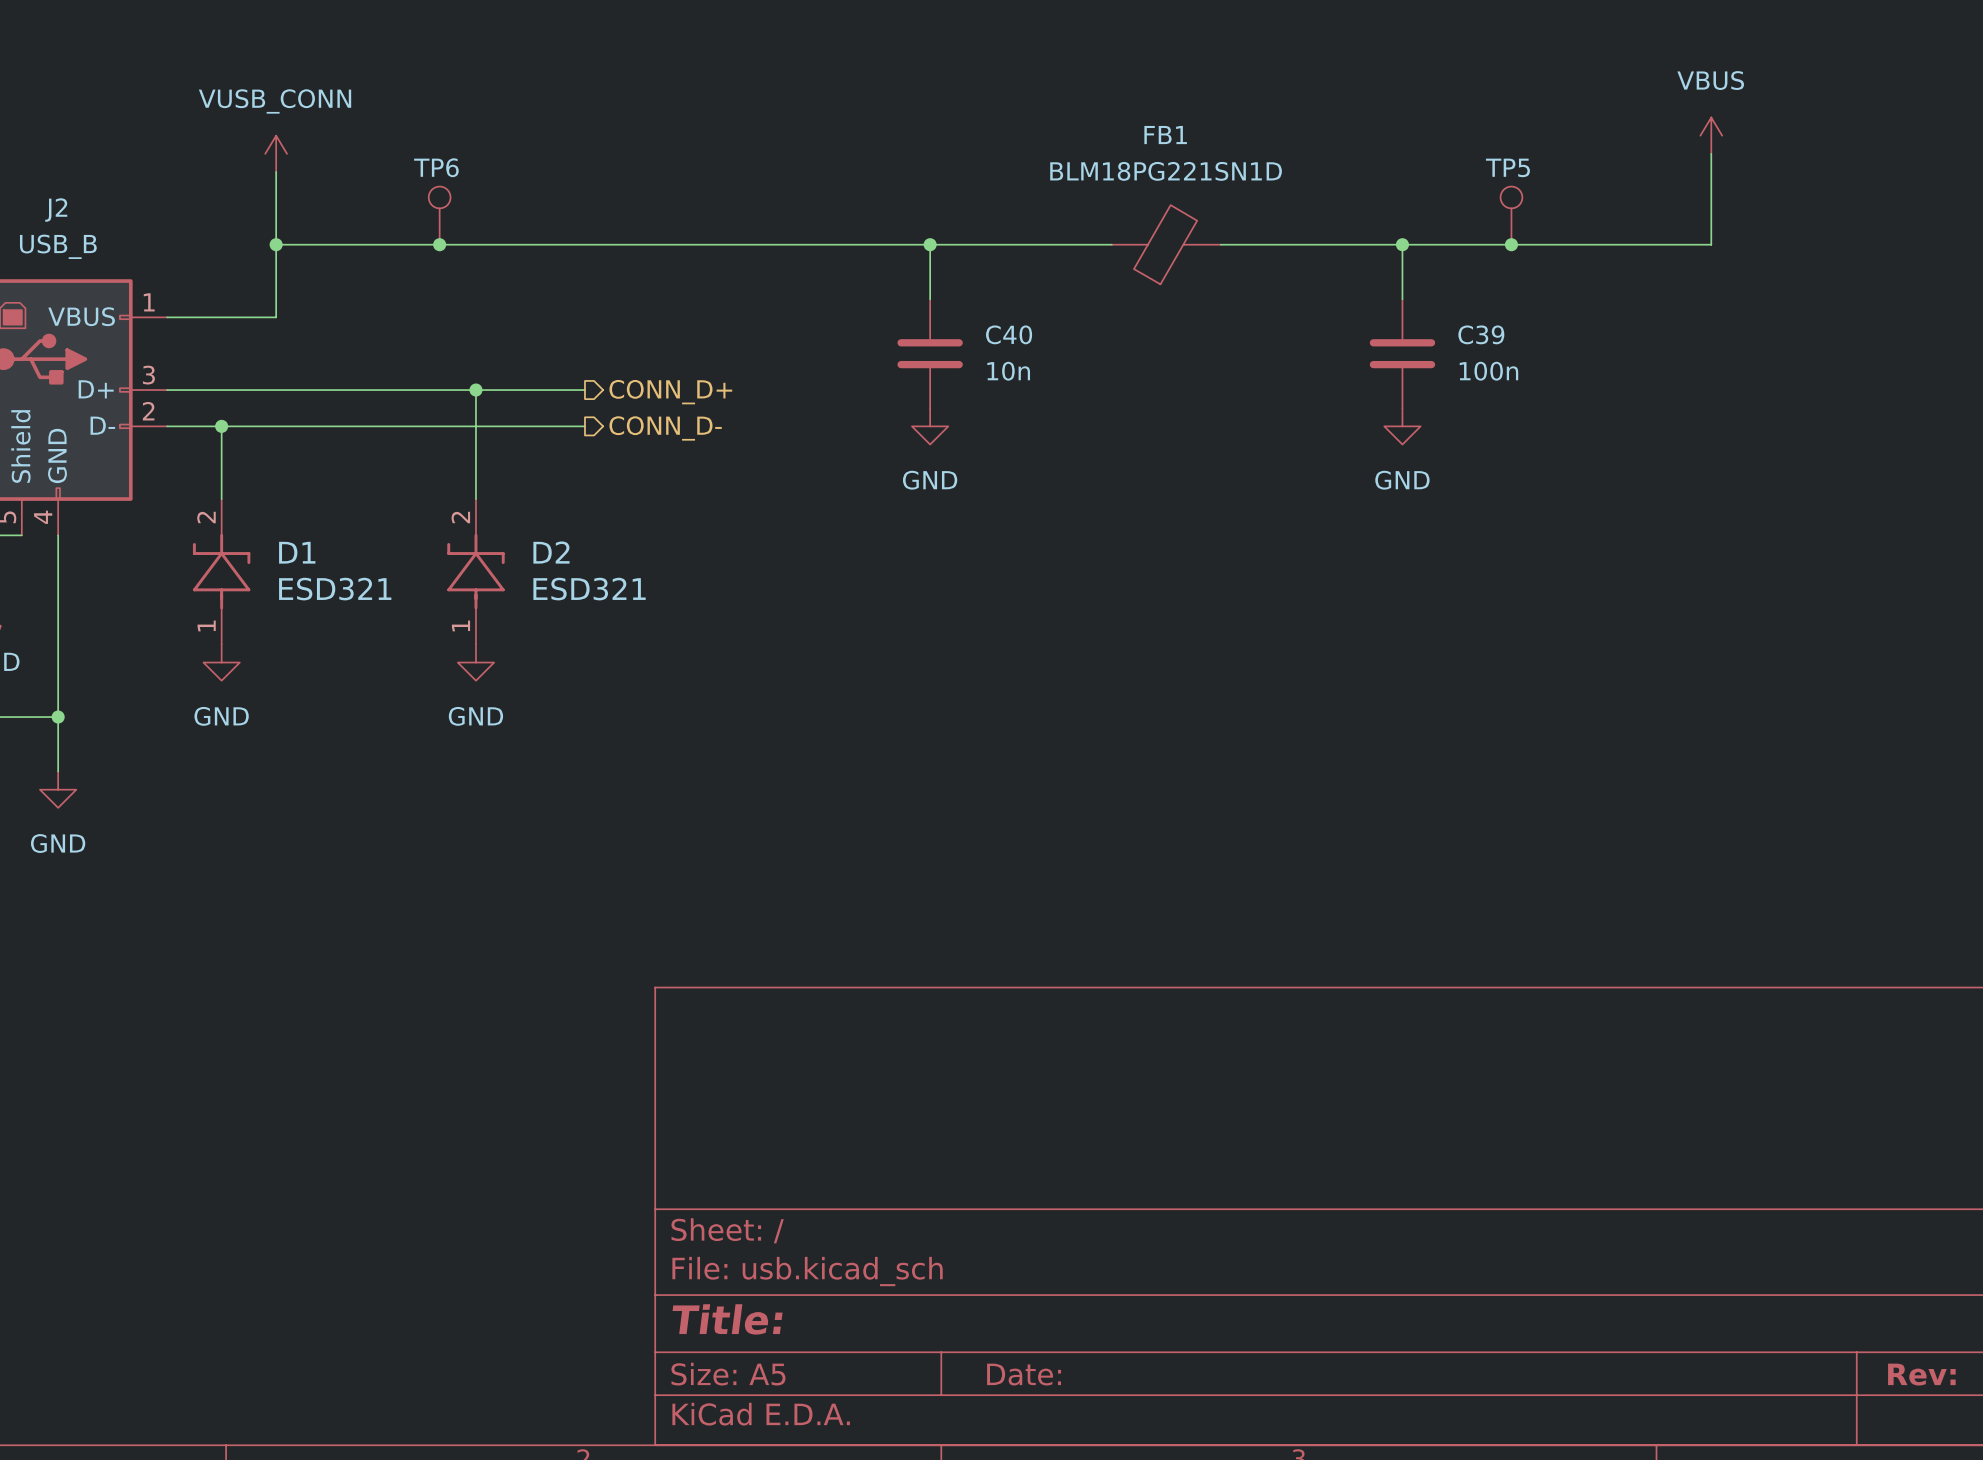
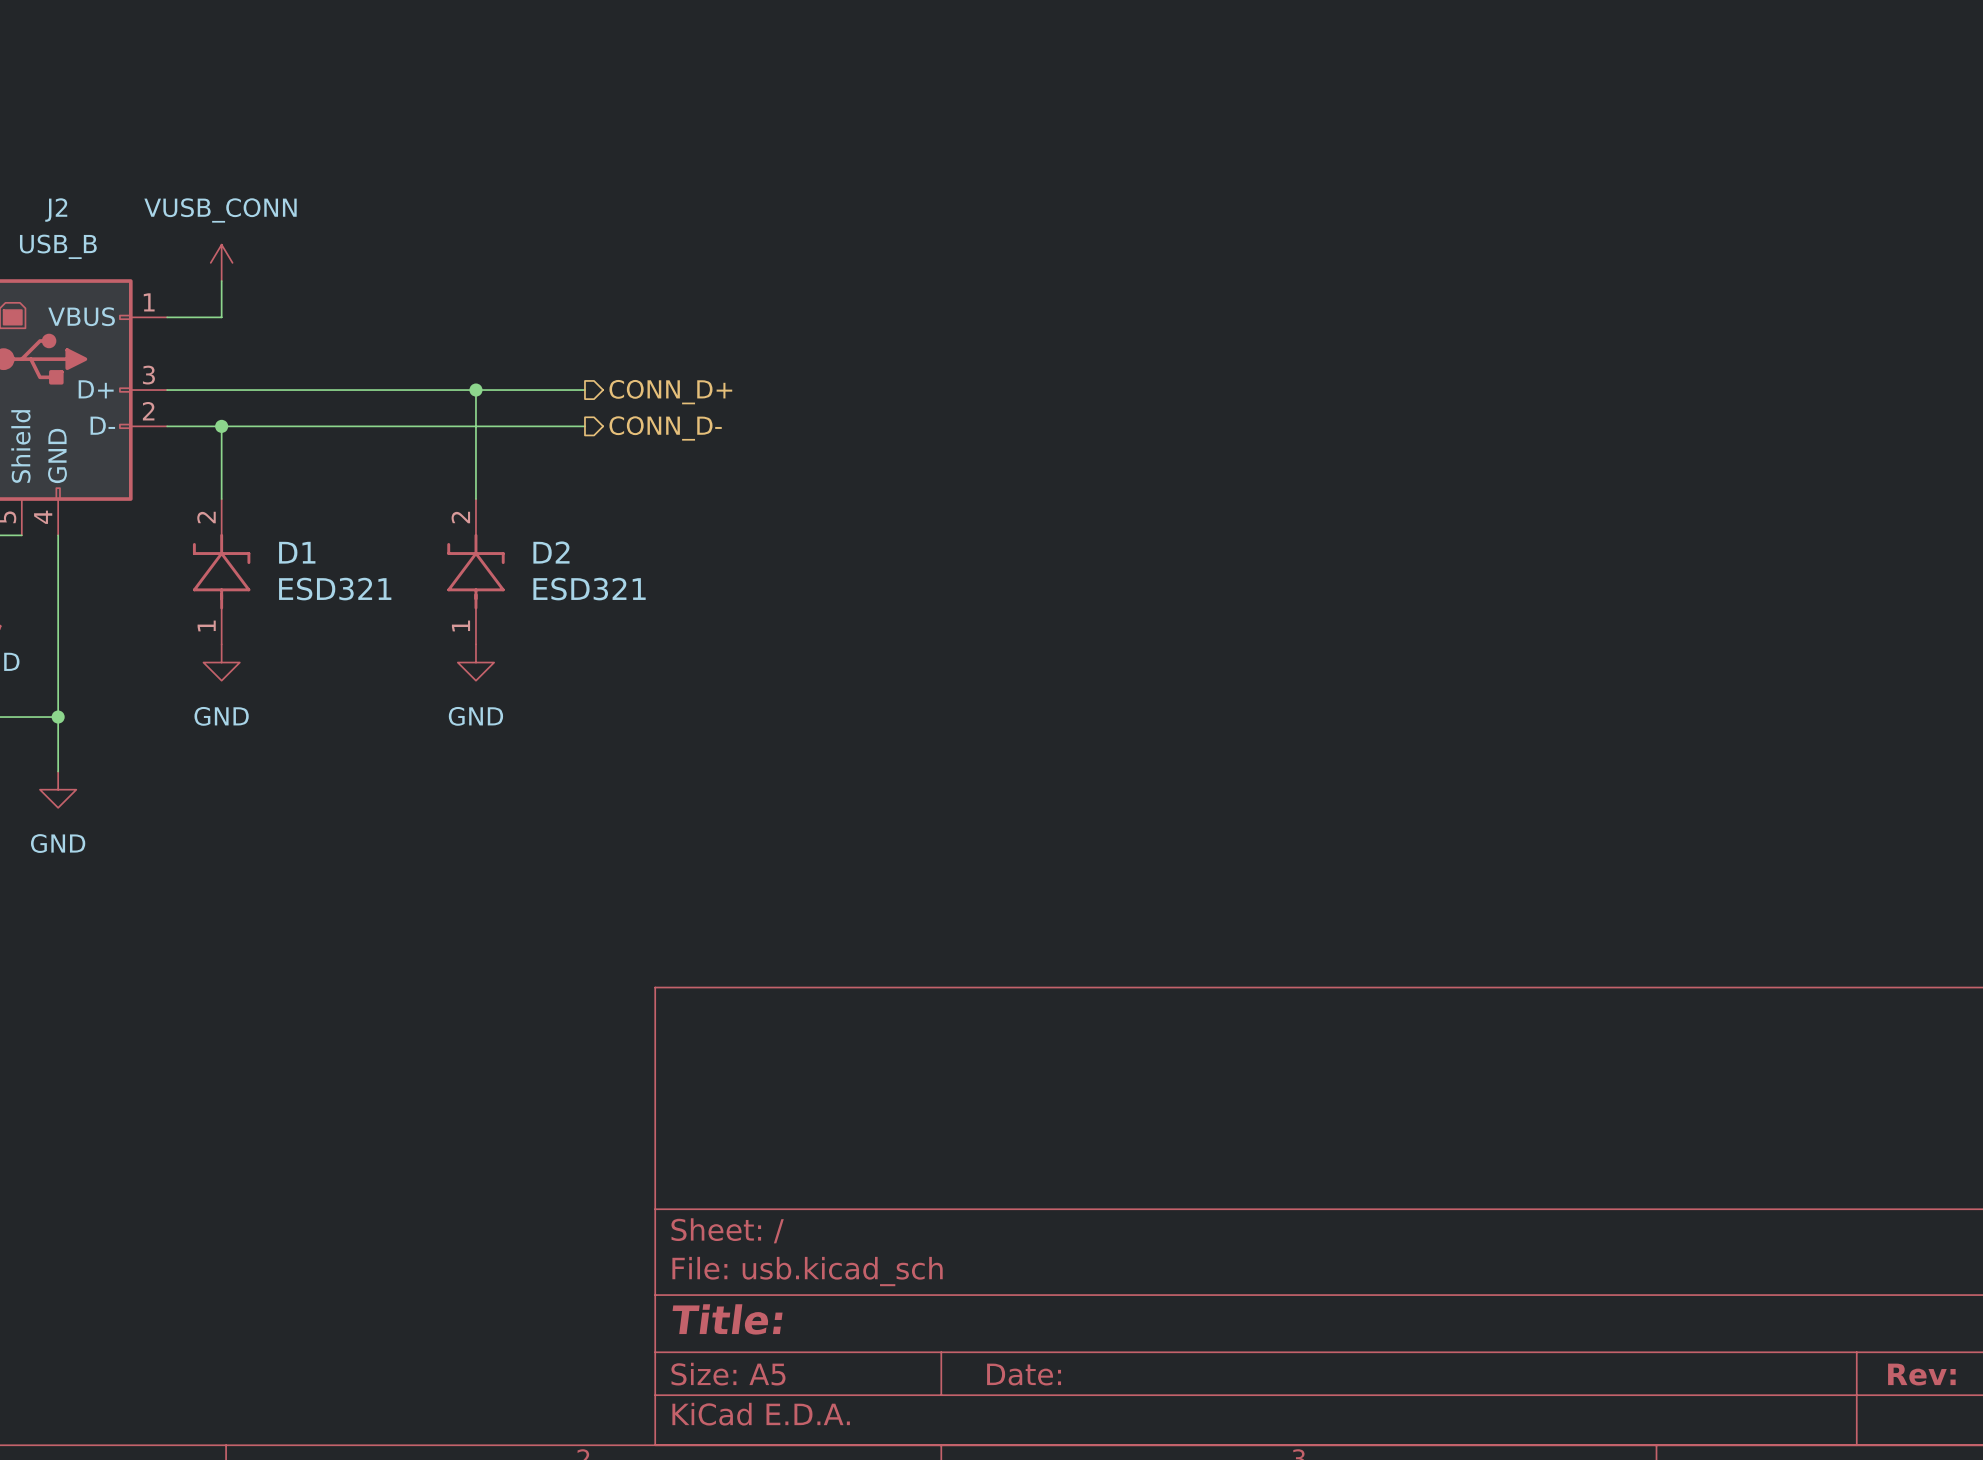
power symbol: VBUS (1711, 135) -> none
power symbol position: VUSB_CONN (276, 153) -> VUSB_CONN (221, 262)
wire: (1711, 153) (1711, 244) (1220, 244) -> none
wire: (276, 172) (276, 317) (221, 317) -> (221, 281) (221, 317)
TP6: (439, 215) -> none
TP5: (1511, 215) -> none
wire: (276, 244) (1111, 244) -> none
junction: (276, 244) -> none
junction: (439, 244) -> none
wire: (930, 244) (930, 299) -> none
junction: (930, 244) -> none
FB1: BLM18PG221SN1D (1166, 244) -> none
wire: (1402, 244) (1402, 299) -> none
junction: (1402, 244) -> none
junction: (1511, 244) -> none
C40: 10n (930, 353) -> none
C39: 100n (1402, 353) -> none
power symbol: GND (930, 426) -> none
power symbol: GND (1402, 426) -> none

